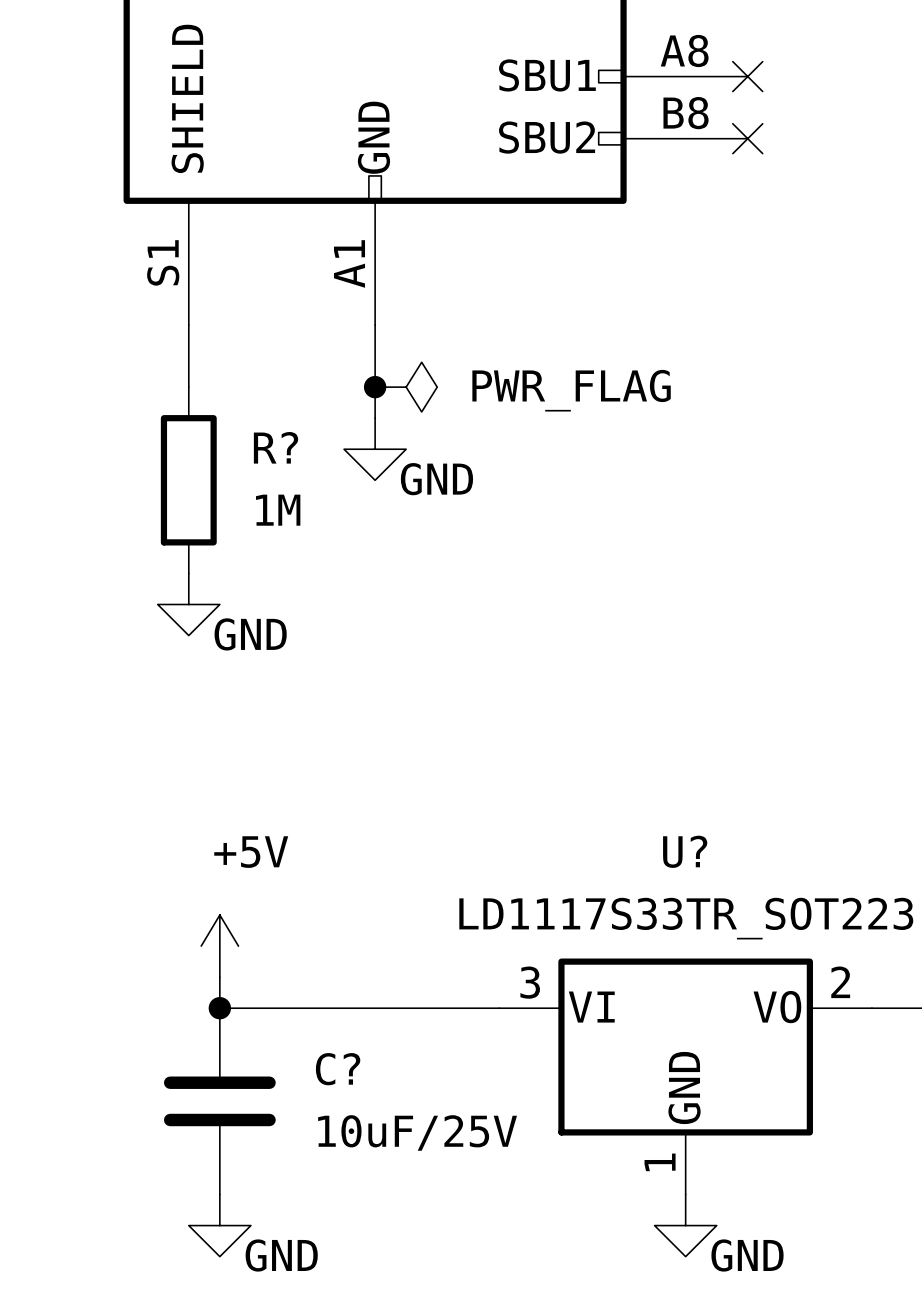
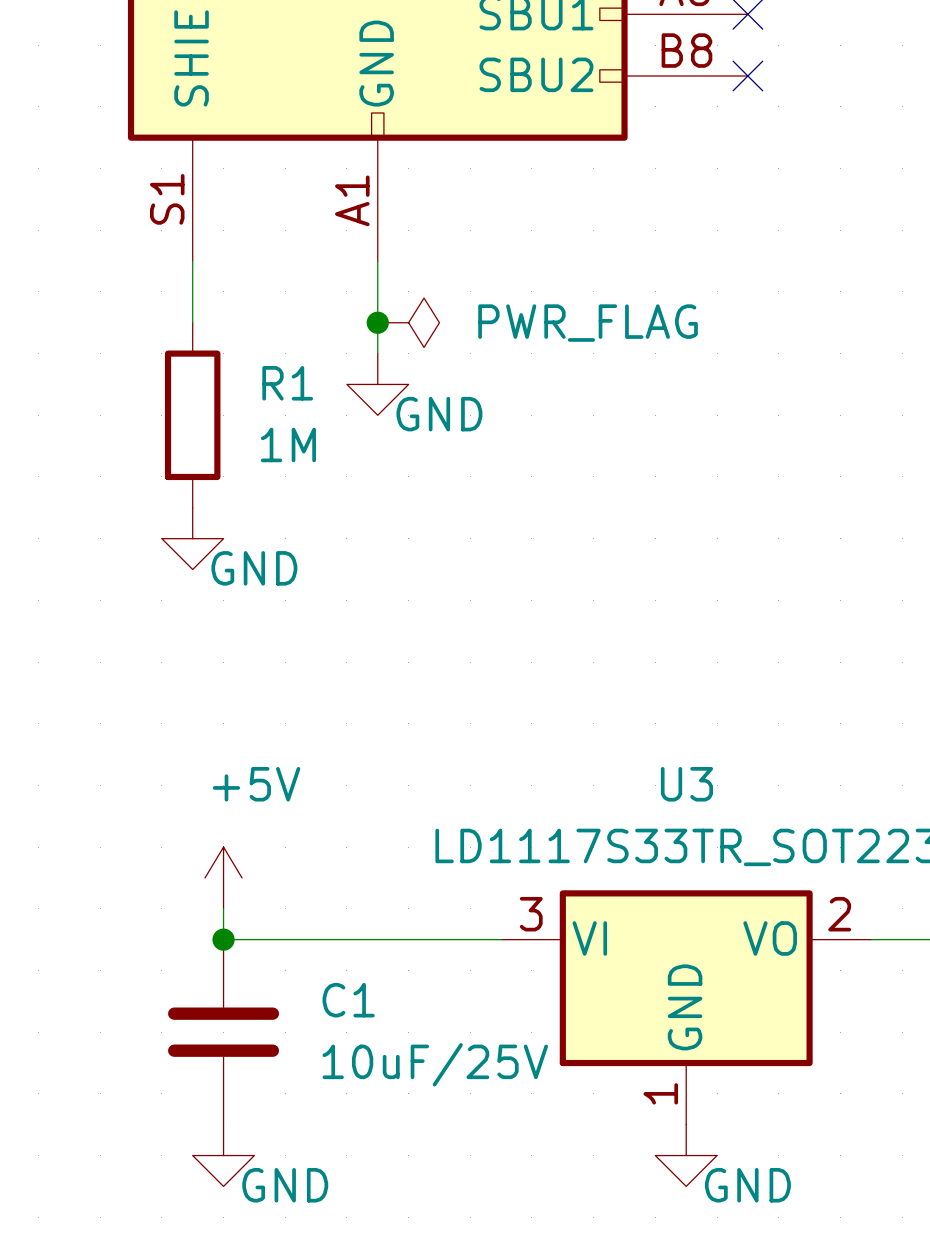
R? name: R? (276, 447) -> R1 (287, 383)
U? name: U? (685, 851) -> U3 (686, 784)
C? name: C? (338, 1069) -> C1 (348, 1000)

